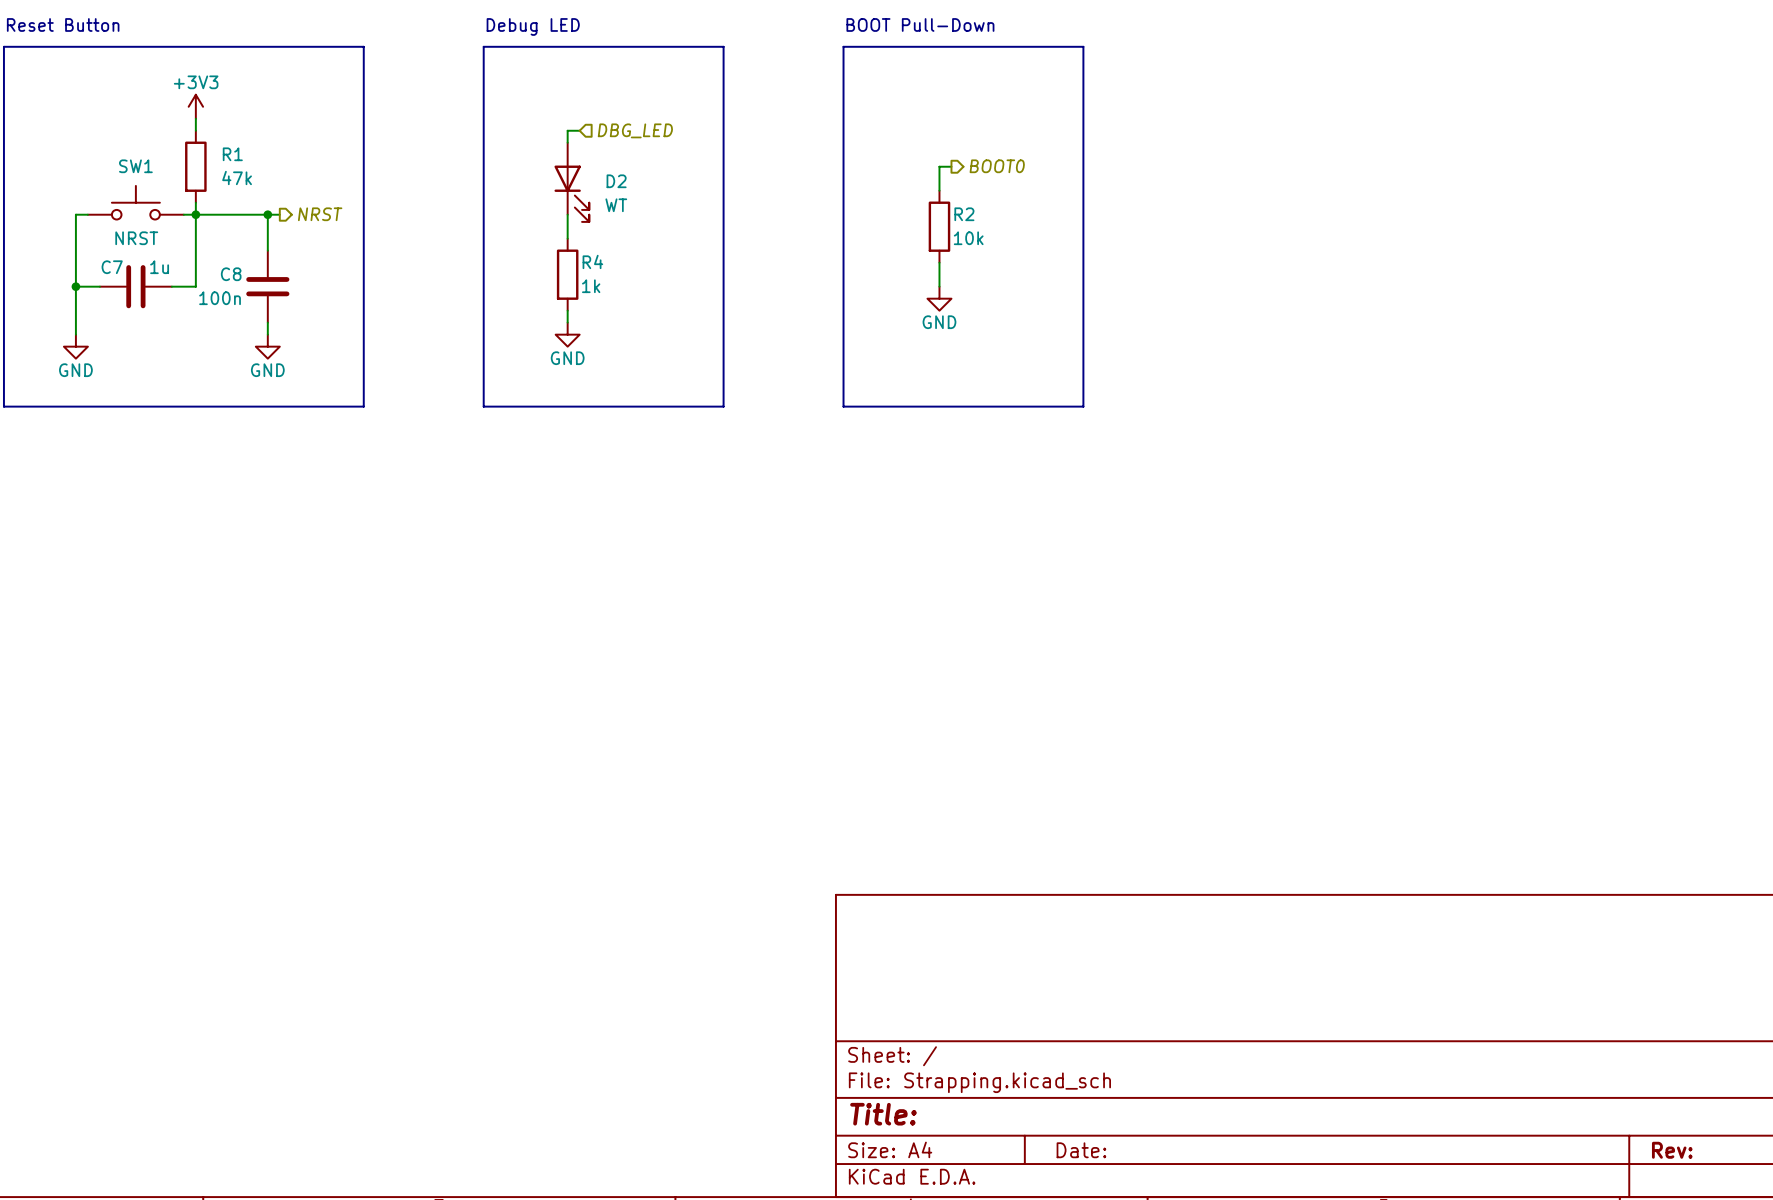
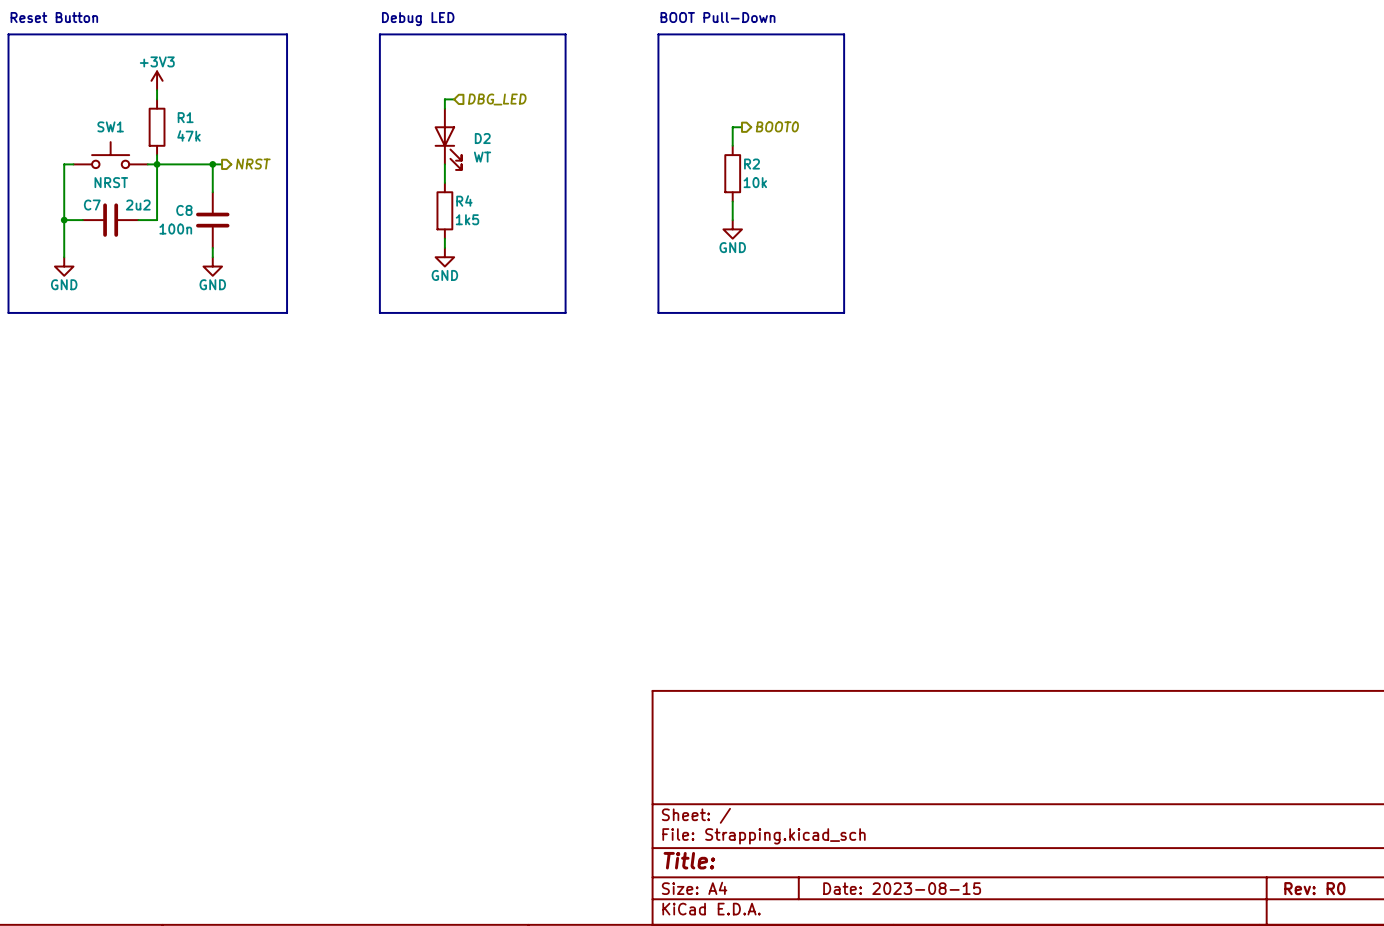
C7 value: 1u (159, 267) -> 2u2 (138, 205)
R4 value: 1k (591, 286) -> 1k5 (467, 219)
title block: Date: (1081, 1150) -> Date: 2023-08-15 (902, 888)
title block: Rev: (1672, 1150) -> Rev: R0 (1314, 888)

